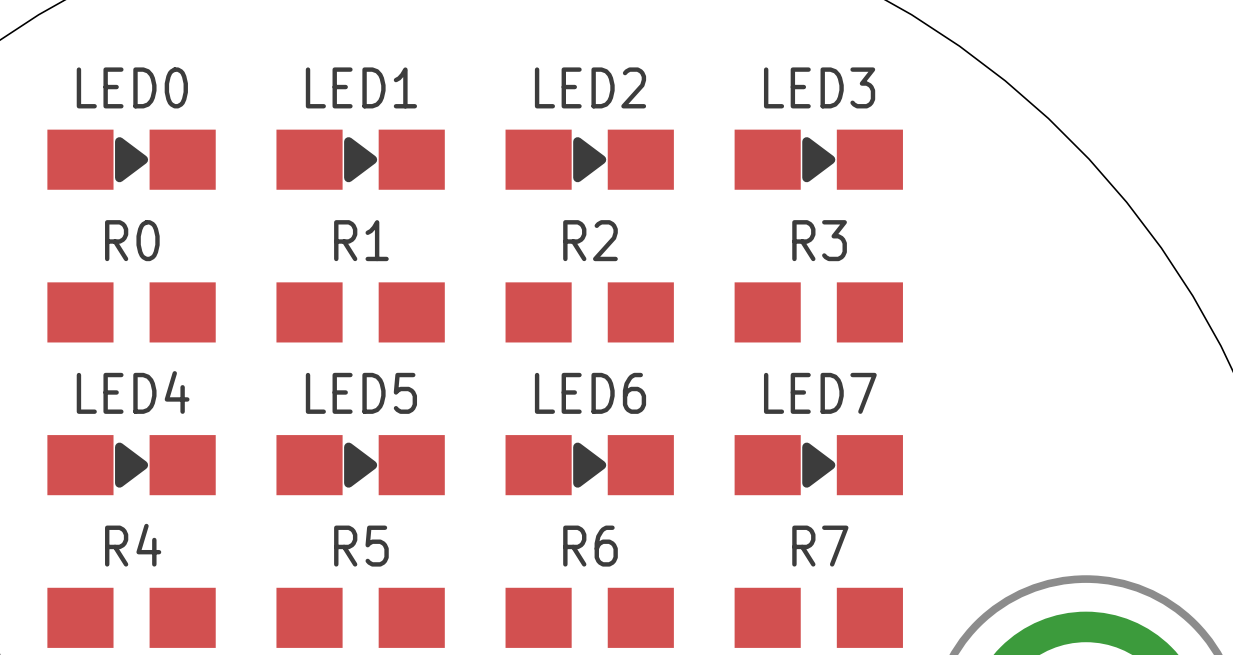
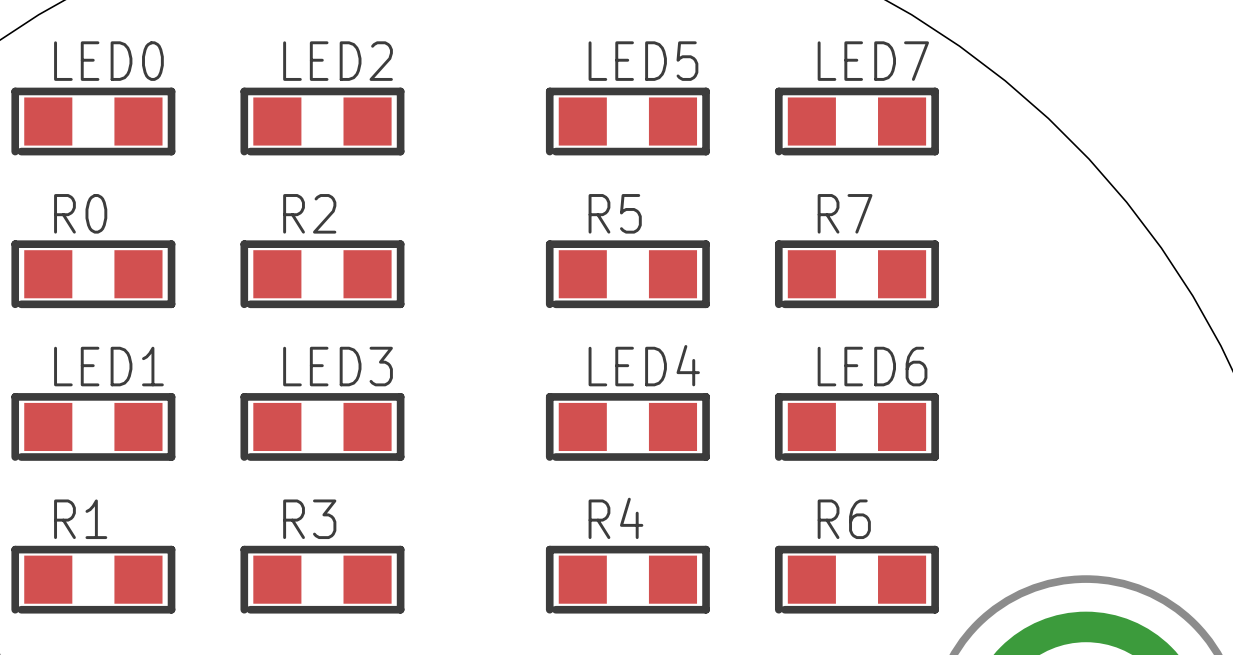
LED0 footprint: [47, 129, 216, 190] -> [11, 87, 176, 156]
LED1 footprint: [276, 129, 445, 190] -> [11, 393, 176, 461]
LED2 footprint: [505, 129, 674, 190] -> [240, 87, 405, 156]
LED3 footprint: [734, 129, 903, 190] -> [240, 393, 405, 461]
R0 footprint: [47, 282, 216, 343] -> [11, 240, 176, 309]
R1 footprint: [276, 282, 445, 343] -> [11, 545, 176, 614]
R2 footprint: [505, 282, 674, 343] -> [240, 240, 405, 309]
R3 footprint: [734, 282, 903, 343] -> [240, 545, 405, 614]
LED4 footprint: [47, 435, 216, 496] -> [545, 393, 710, 461]
LED5 footprint: [276, 435, 445, 496] -> [545, 87, 710, 156]
LED6 footprint: [505, 435, 674, 496] -> [774, 393, 939, 461]
LED7 footprint: [734, 435, 903, 496] -> [774, 87, 939, 156]
R4 footprint: [47, 587, 216, 648] -> [545, 545, 710, 614]
R5 footprint: [276, 587, 445, 648] -> [545, 240, 710, 309]
R6 footprint: [505, 587, 674, 648] -> [774, 545, 939, 614]
R7 footprint: [734, 587, 903, 648] -> [774, 240, 939, 309]

